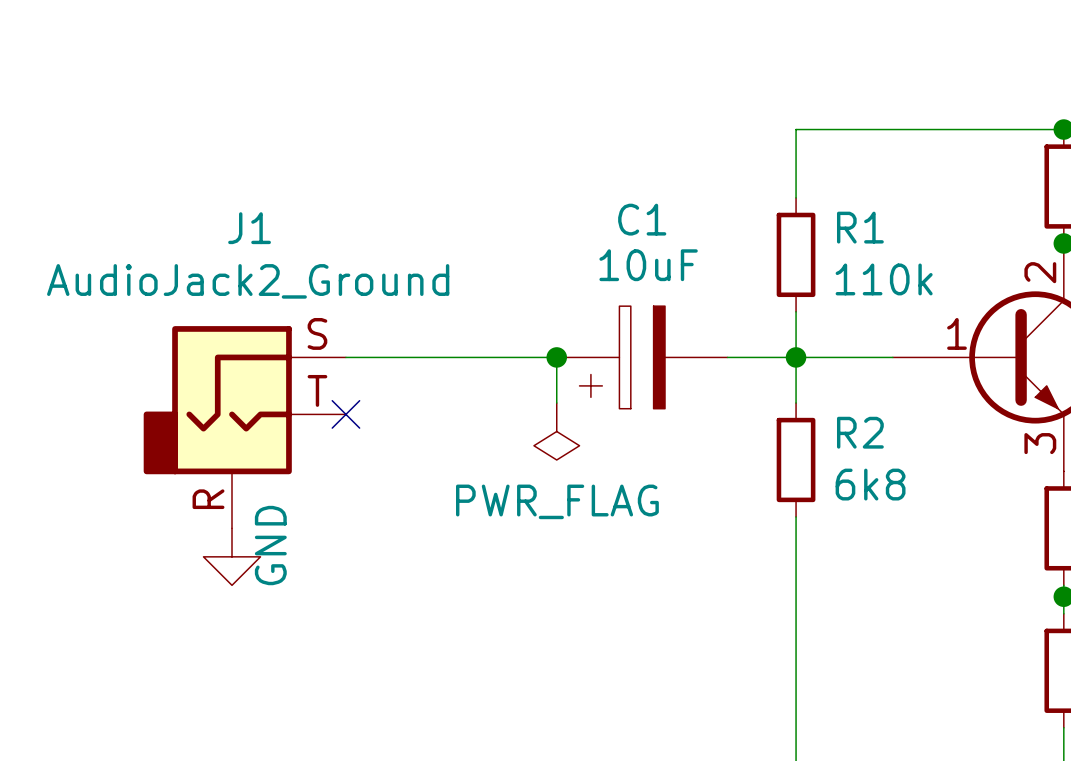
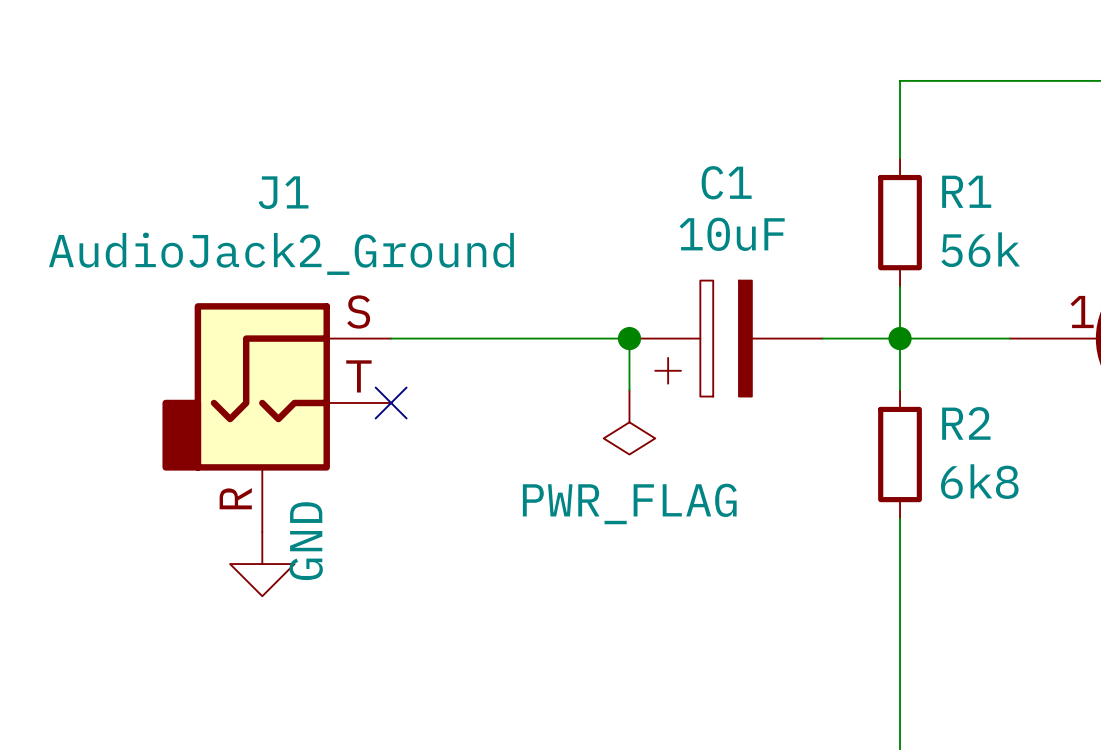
R1 value: 110k (884, 279) -> 56k (980, 249)

